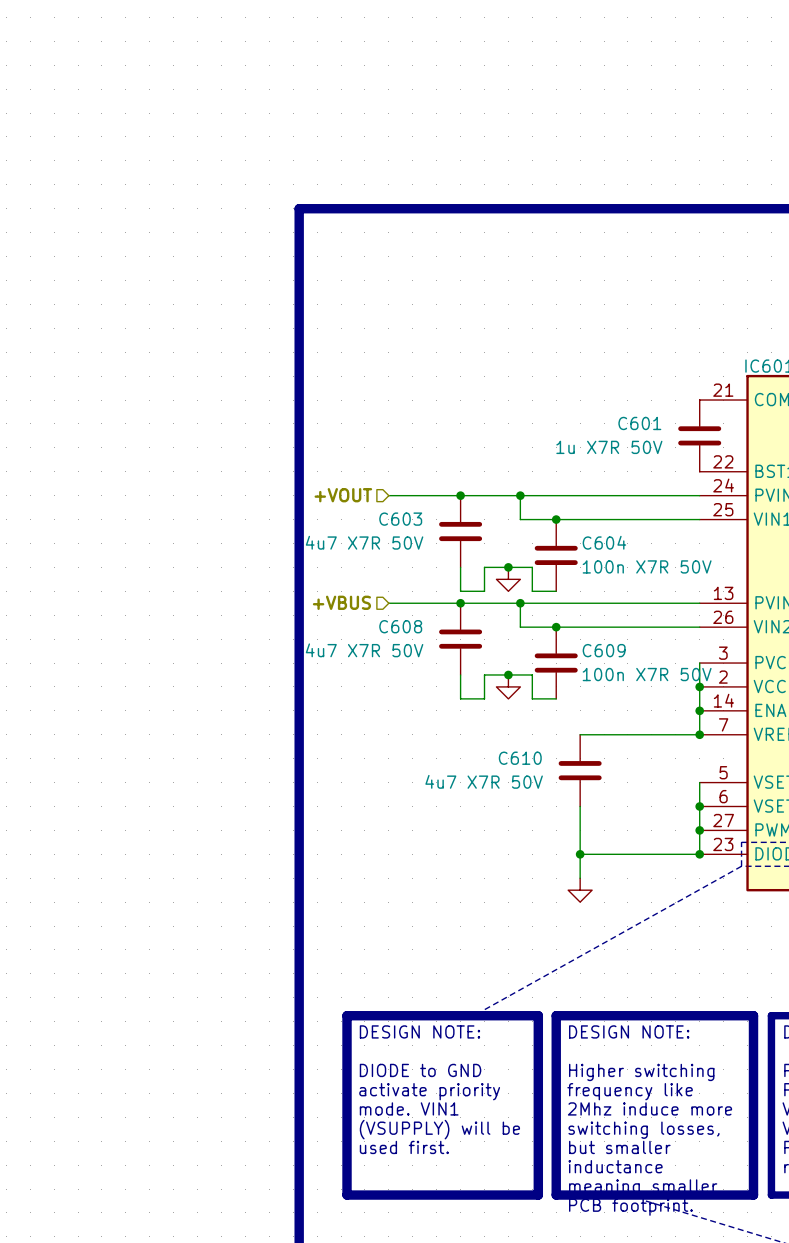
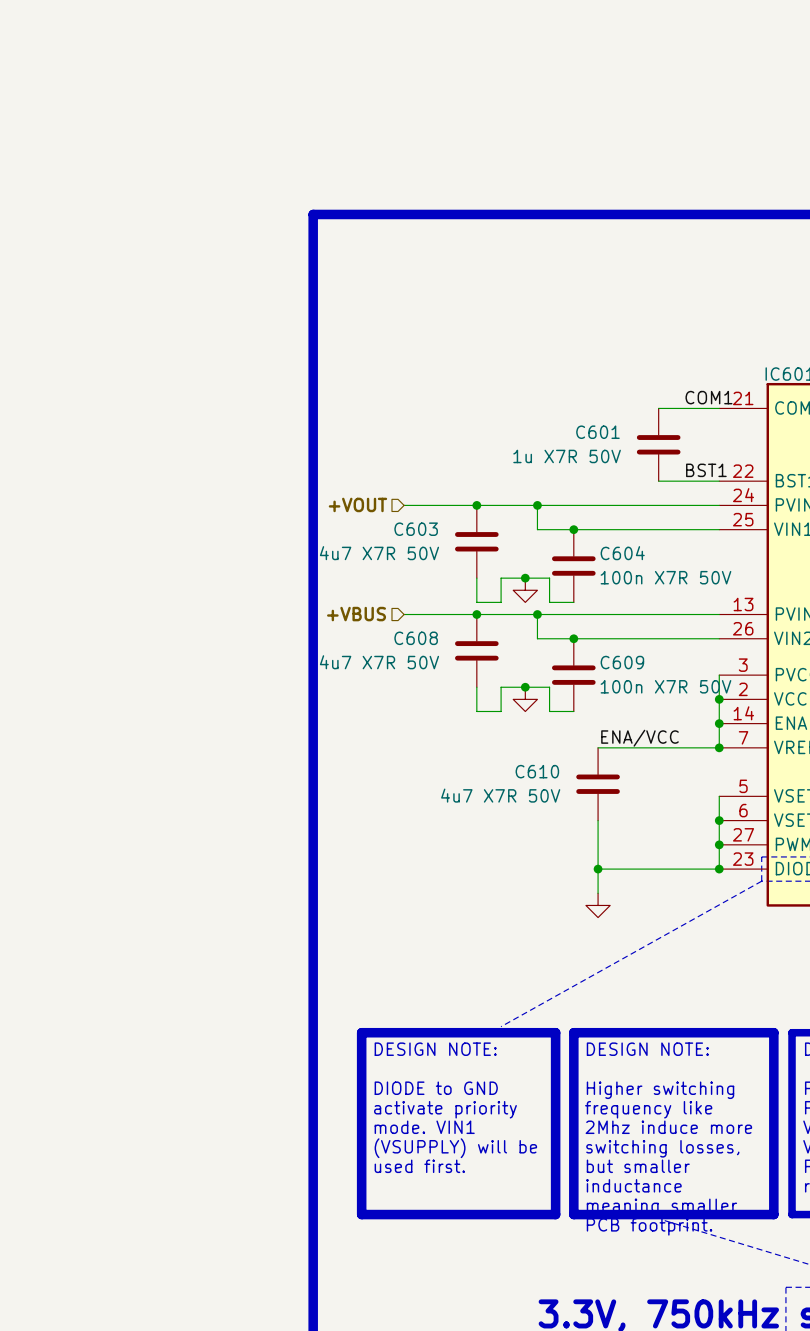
label: none -> COM1 (708, 397)
wire: none -> (658, 408) (719, 408)
C601 position: (699, 435) -> (658, 444)
label: none -> BST1 (706, 470)
wire: none -> (658, 481) (719, 481)
label: none -> ENA/VCC (640, 738)

